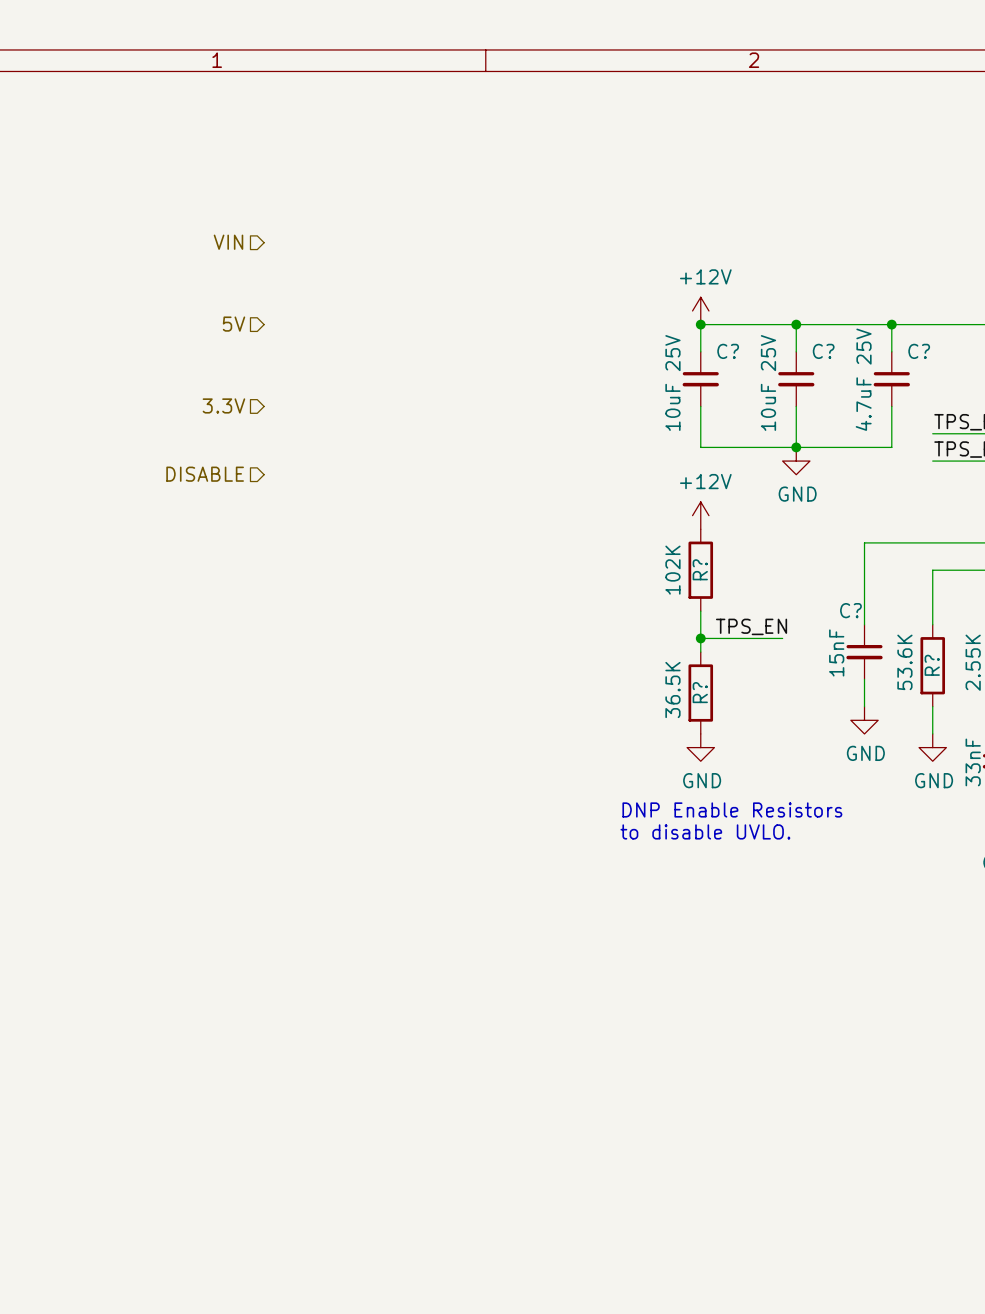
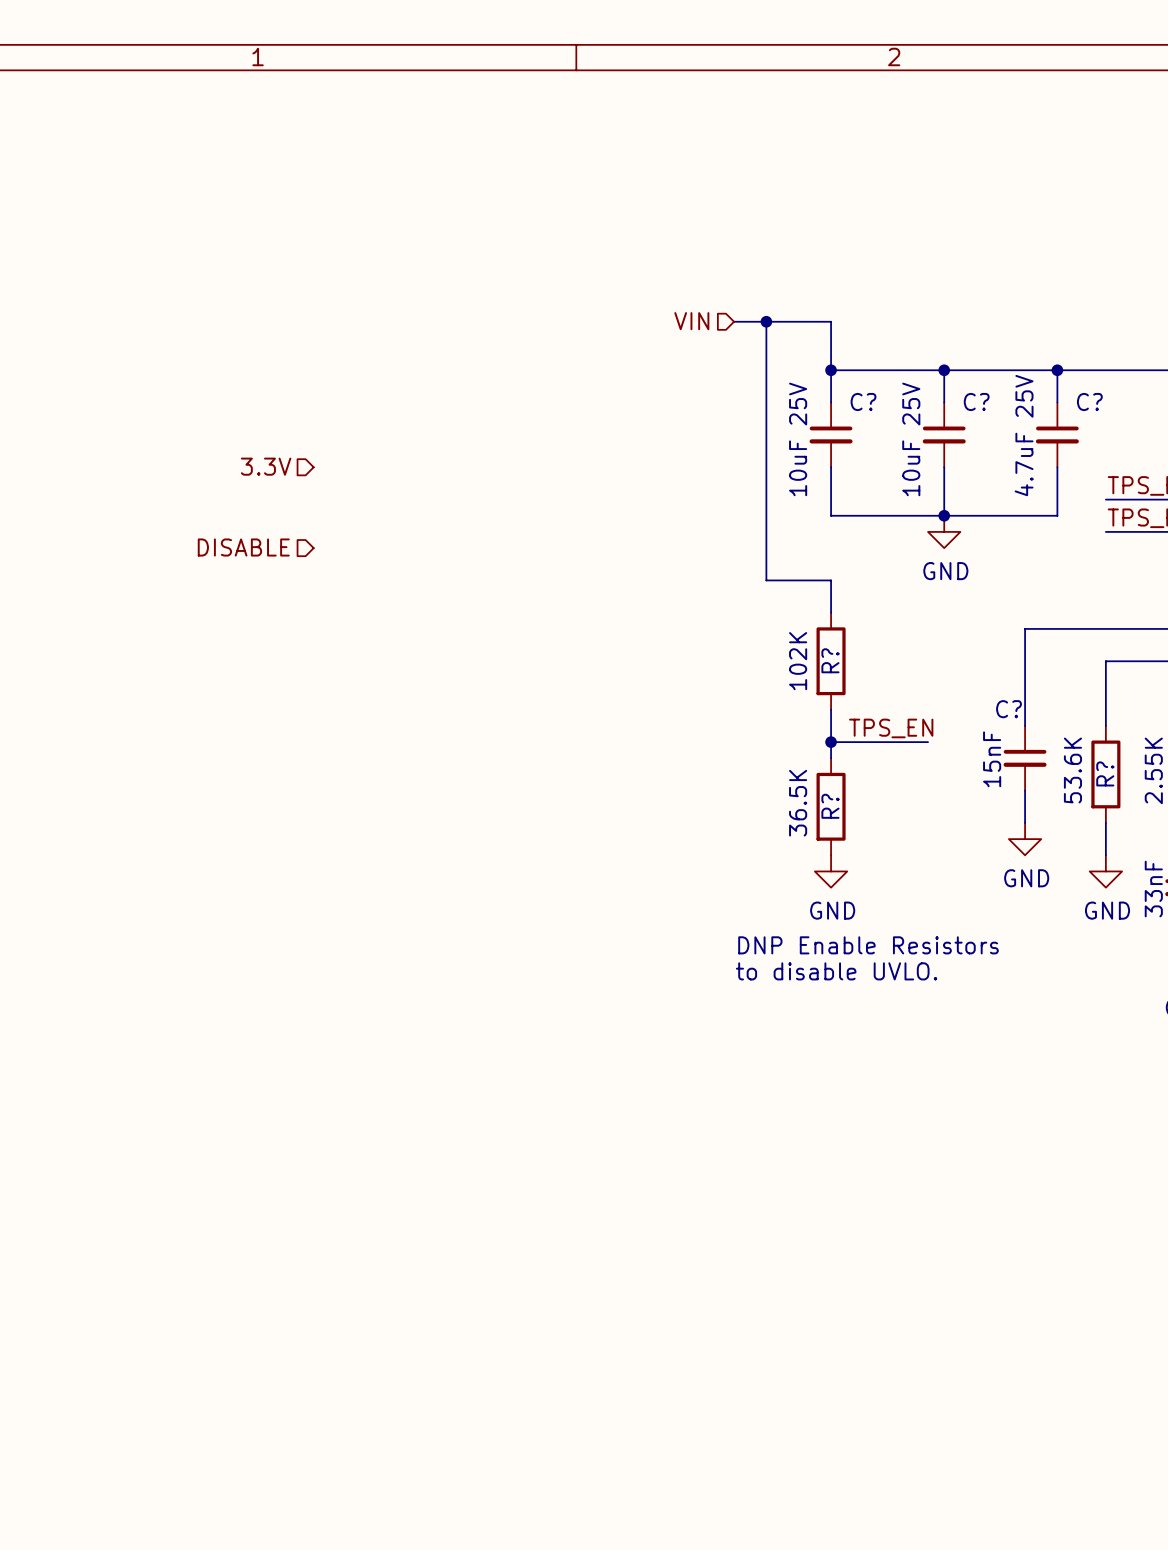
hierarchical label: VIN (228, 242) -> none
hierarchical label: none -> VIN (691, 321)
wire: none -> (734, 321) (831, 321) (831, 370)
wire: none -> (766, 321) (766, 580) (831, 580) (831, 612)
junction: none -> (766, 321)
power symbol: +12V (700, 310) -> none
hierarchical label: 5V (234, 324) -> none
power symbol: +12V (700, 515) -> none

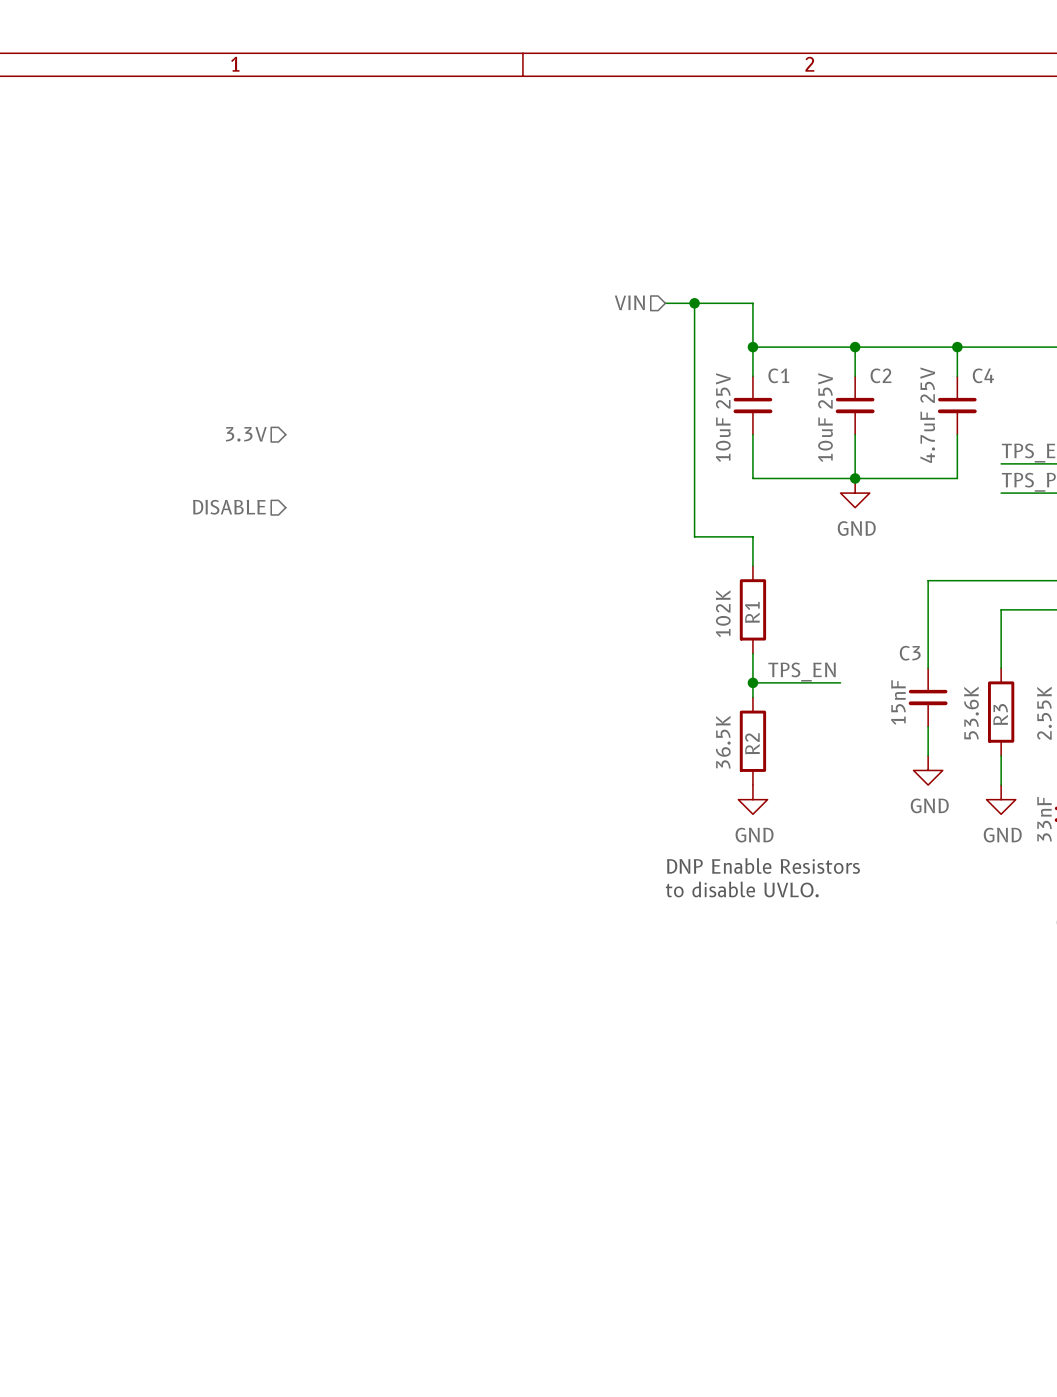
C? name: C? (863, 401) -> C1 (778, 375)
C? name: C? (976, 401) -> C2 (881, 375)
C? name: C? (1089, 401) -> C4 (983, 375)
R? name: R? (830, 660) -> R1 (752, 612)
C? name: C? (1009, 709) -> C3 (910, 653)
R? name: R? (1105, 773) -> R3 (1000, 714)
R? name: R? (830, 806) -> R2 (752, 743)

